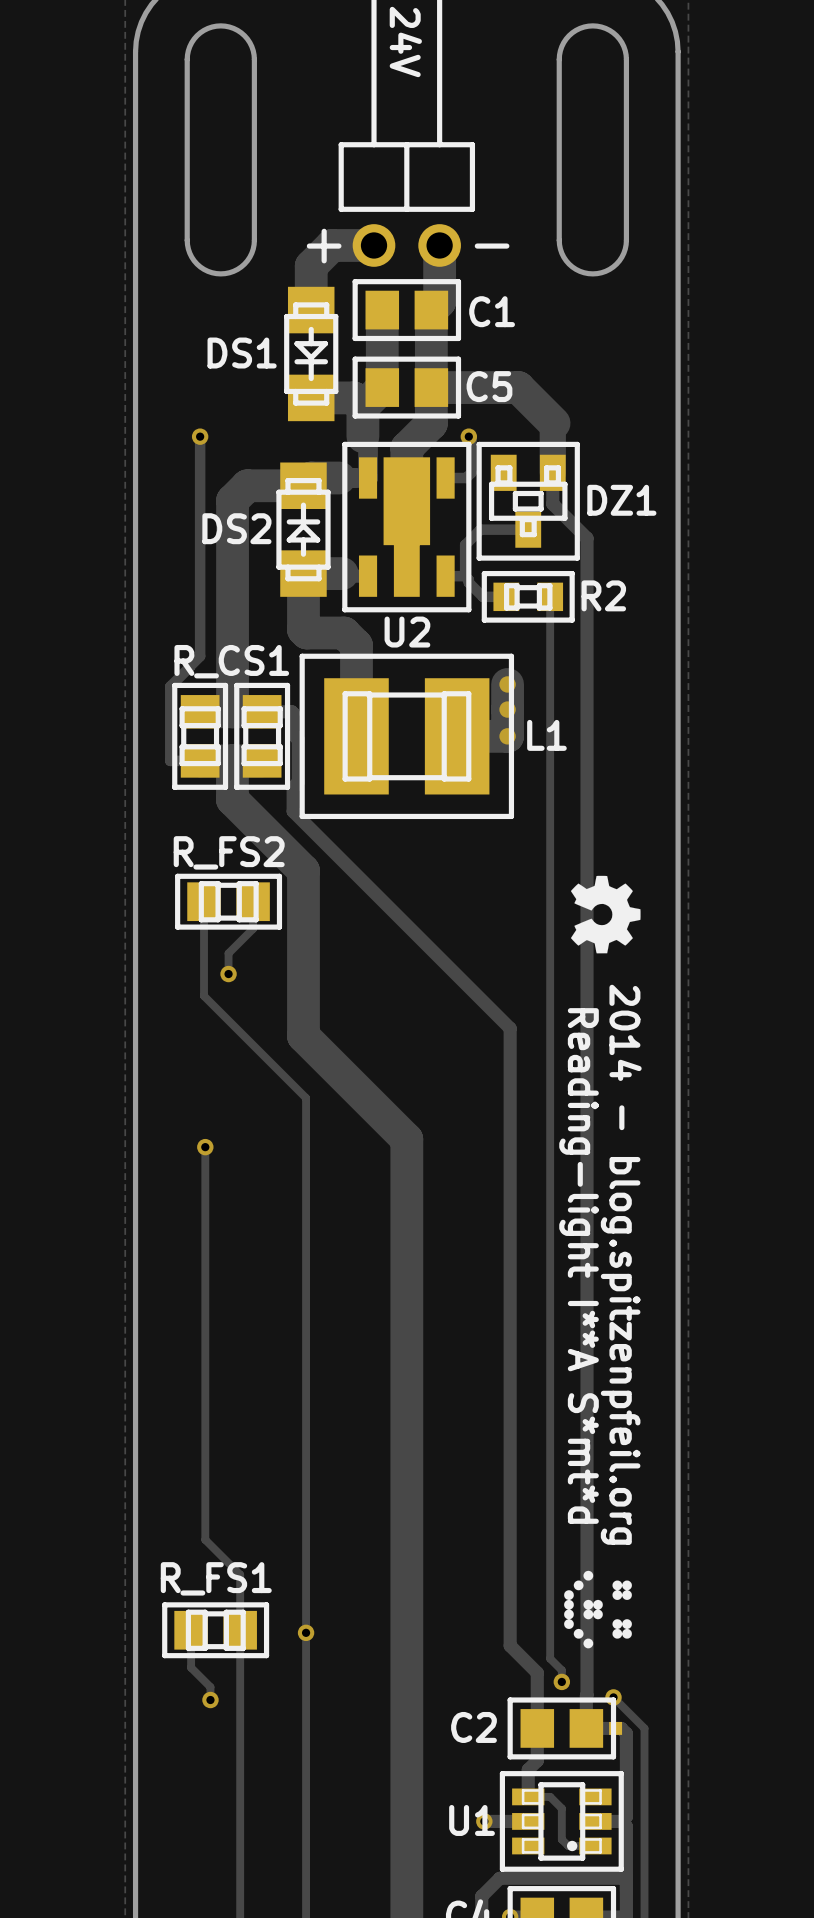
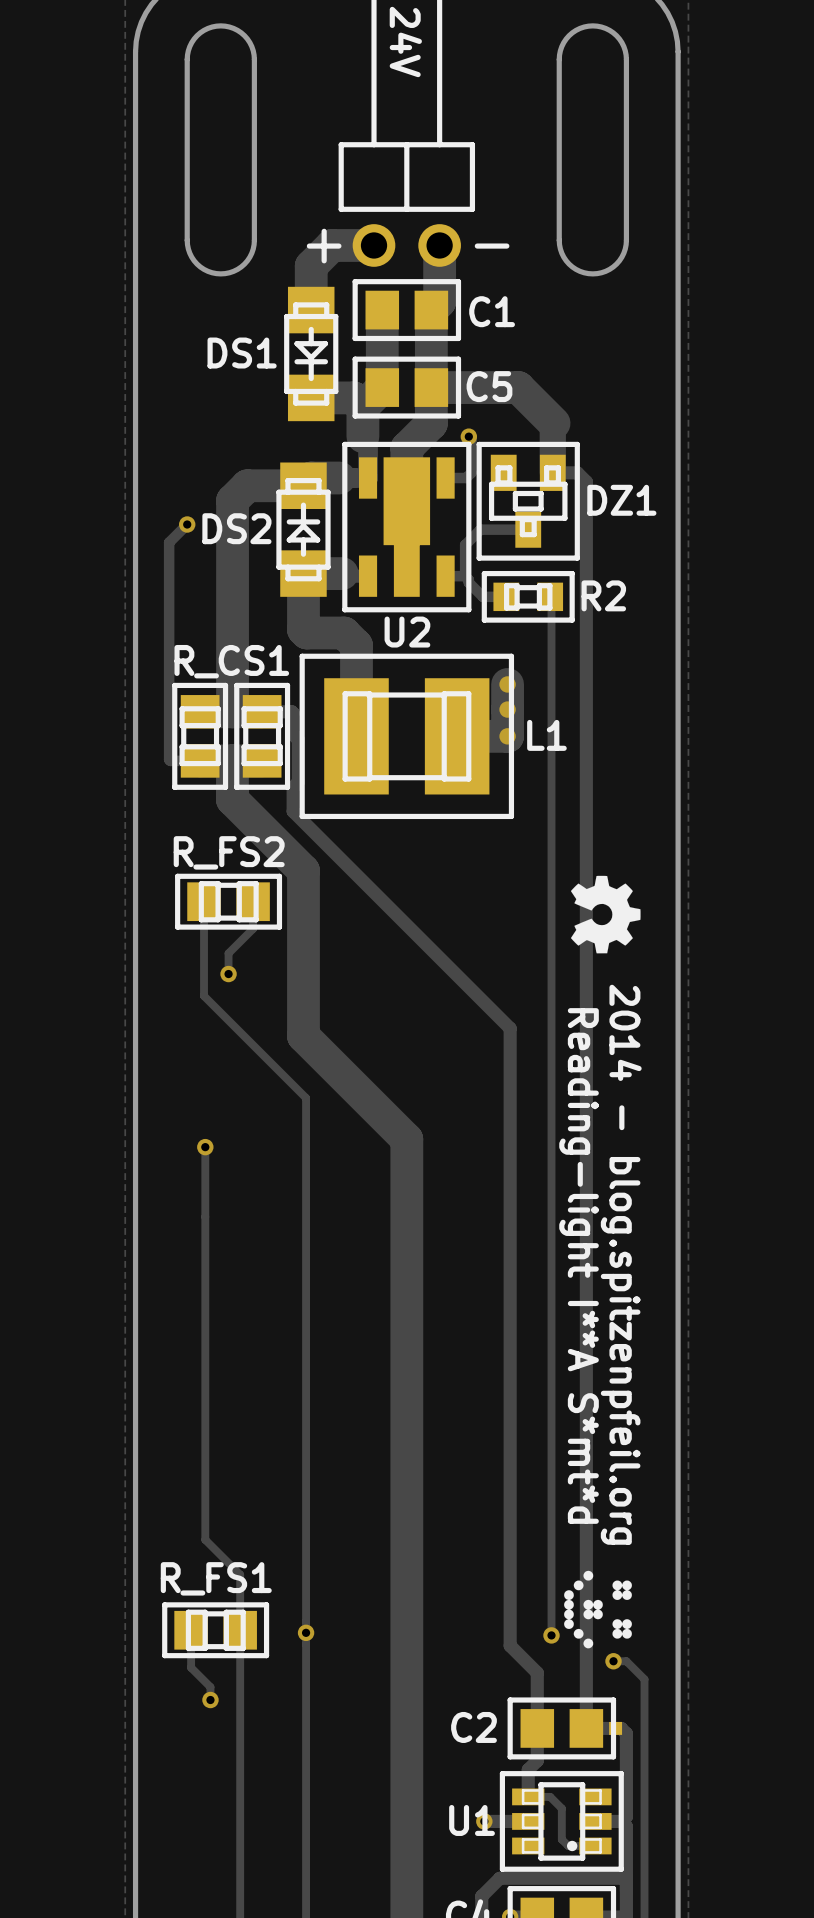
track: (200, 436) (200, 656) (170, 686) (170, 760) -> (187, 524) (169, 542) (170, 760)
via position: (200, 436) -> (187, 524)
track: (552, 472) (552, 504) (587, 538) (586, 1695) -> (552, 472) (577, 472) (586, 481) (586, 1695)
track: (550, 596) (550, 1658) (561, 1670) (561, 1681) -> (550, 596) (551, 1635)
via: none -> (551, 1635)
via: none -> (613, 1661)
via: (561, 1681) -> none
track: (613, 1697) (644, 1728) -> (613, 1661) (626, 1661) (644, 1679) (644, 1728)
via: (613, 1697) -> none

